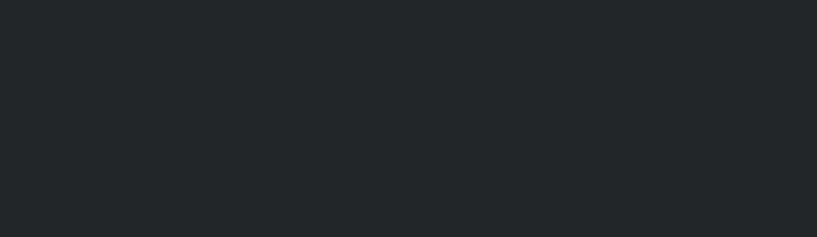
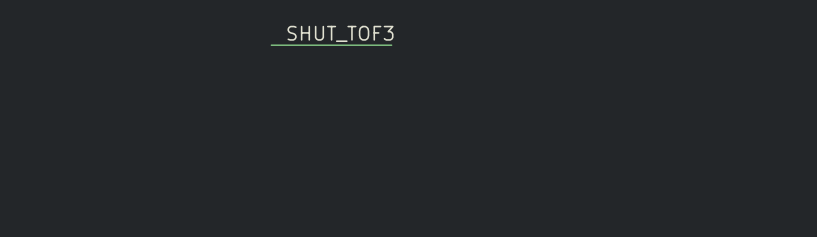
label: none -> SHUT_TOF3 (340, 33)
wire: none -> (271, 45) (391, 45)

